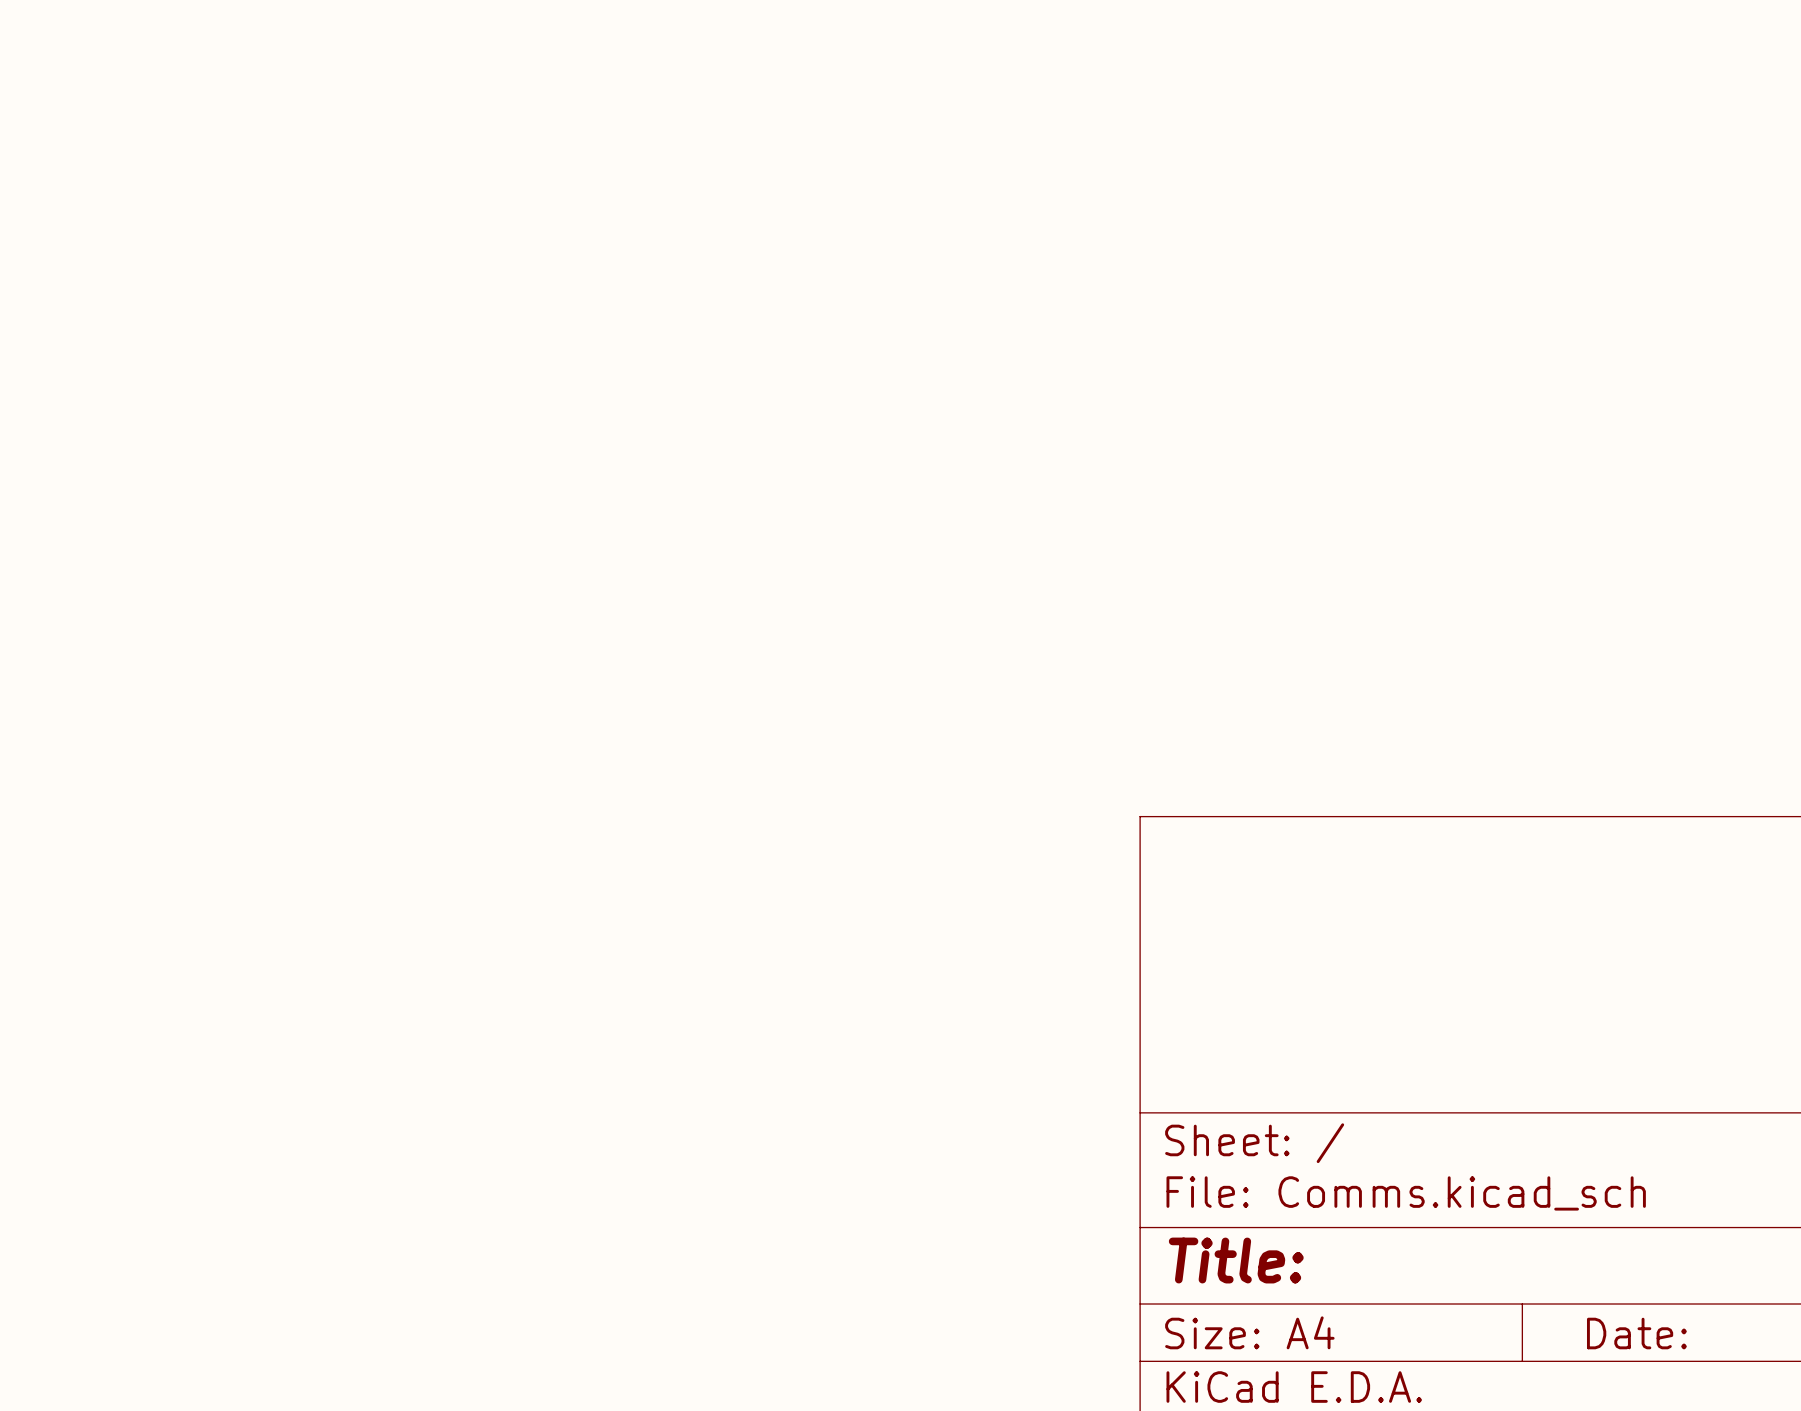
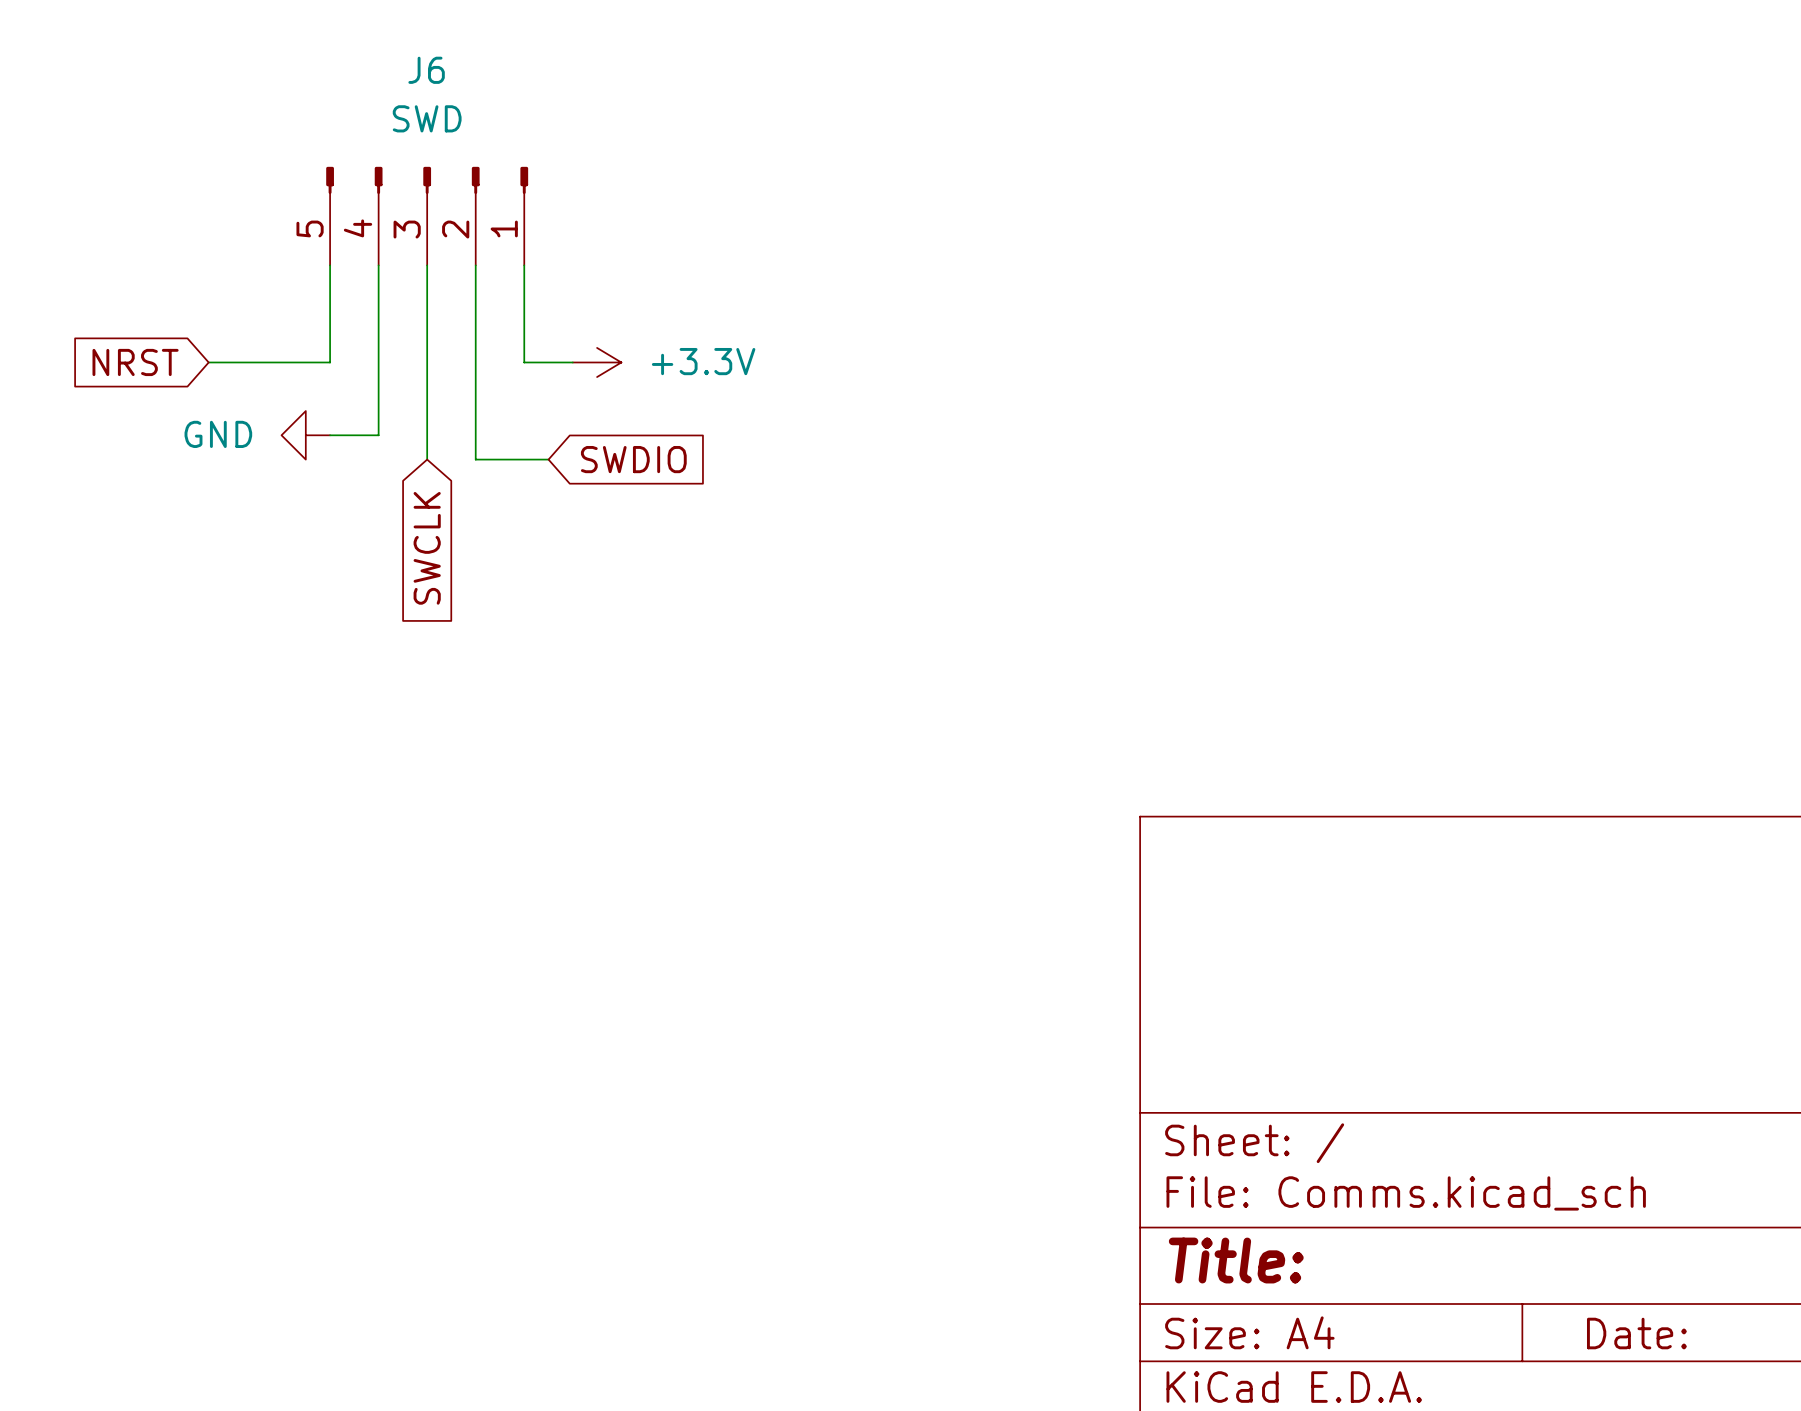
J6: none -> SWD (427, 216)
wire: none -> (330, 265) (330, 362) (208, 362)
wire: none -> (378, 265) (378, 435) (330, 435)
wire: none -> (427, 265) (427, 459)
wire: none -> (475, 265) (475, 459) (548, 459)
wire: none -> (524, 265) (524, 362) (572, 362)
global label: none -> NRST (135, 362)
power symbol: none -> +3.3V (597, 362)
power symbol: none -> GND (305, 435)
global label: none -> SWDIO (633, 459)
global label: none -> SWCLK (427, 548)

